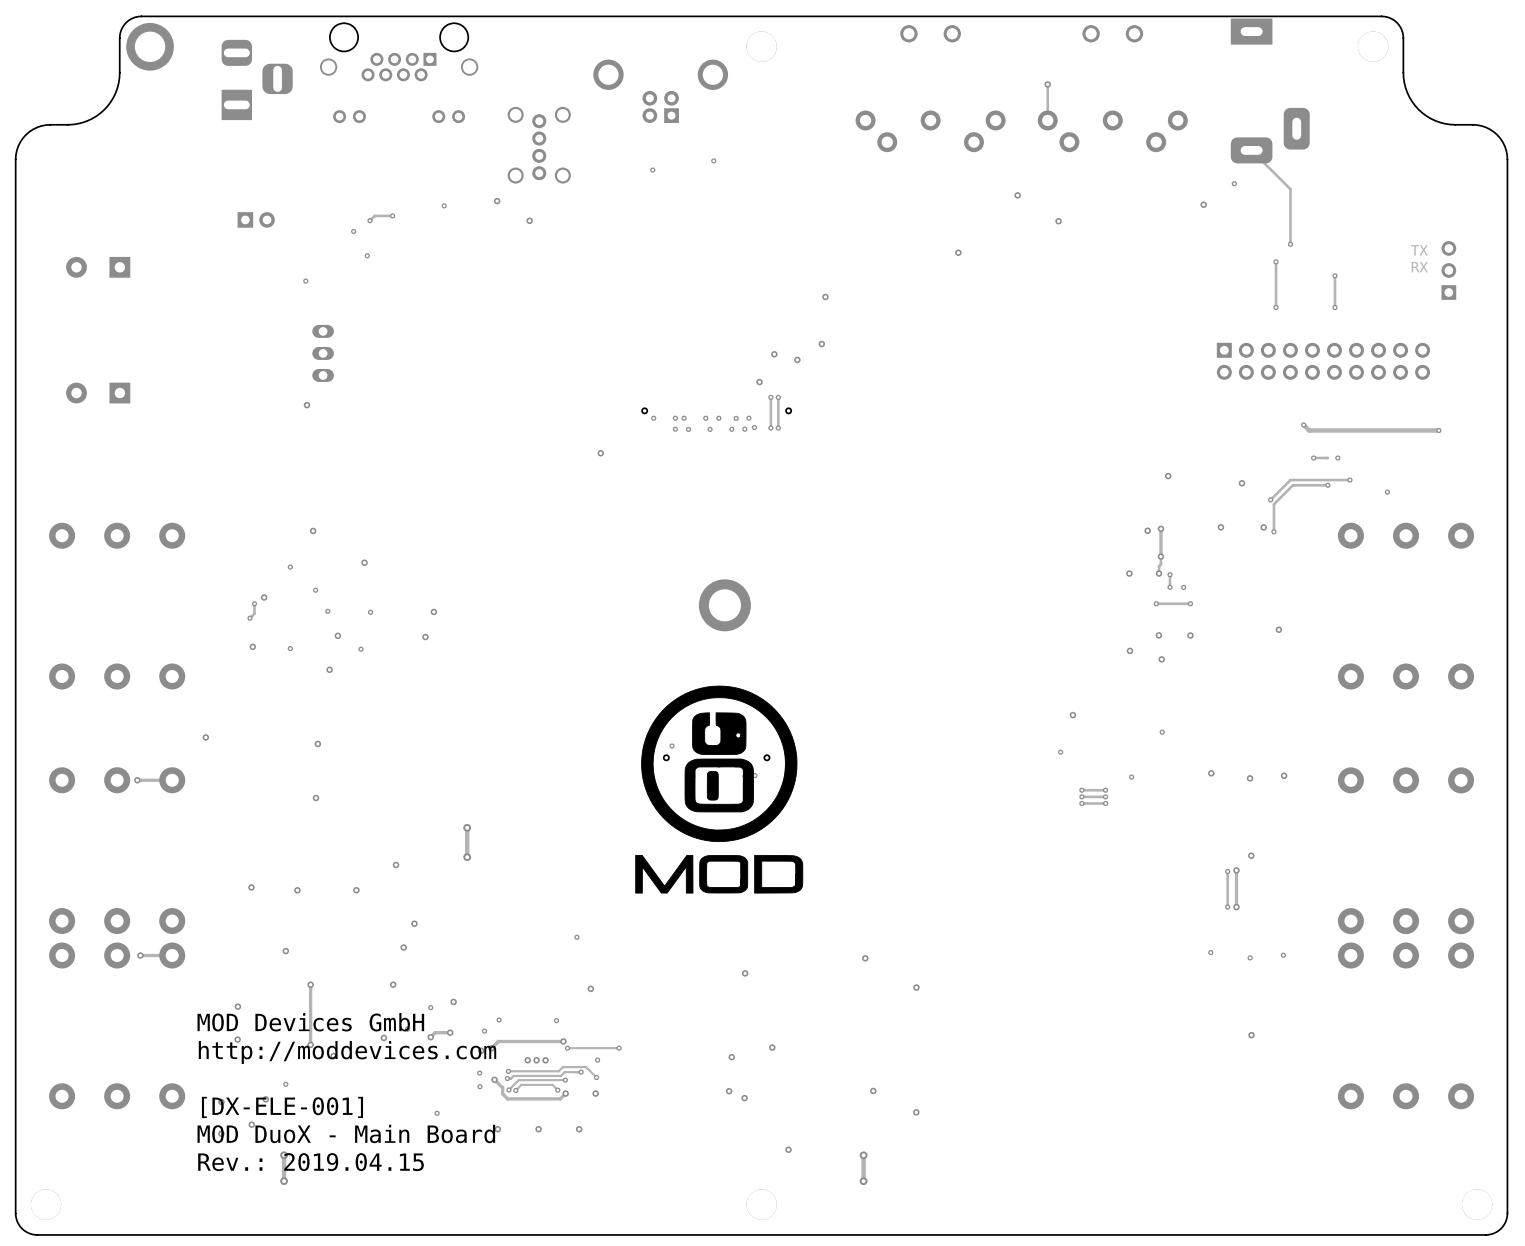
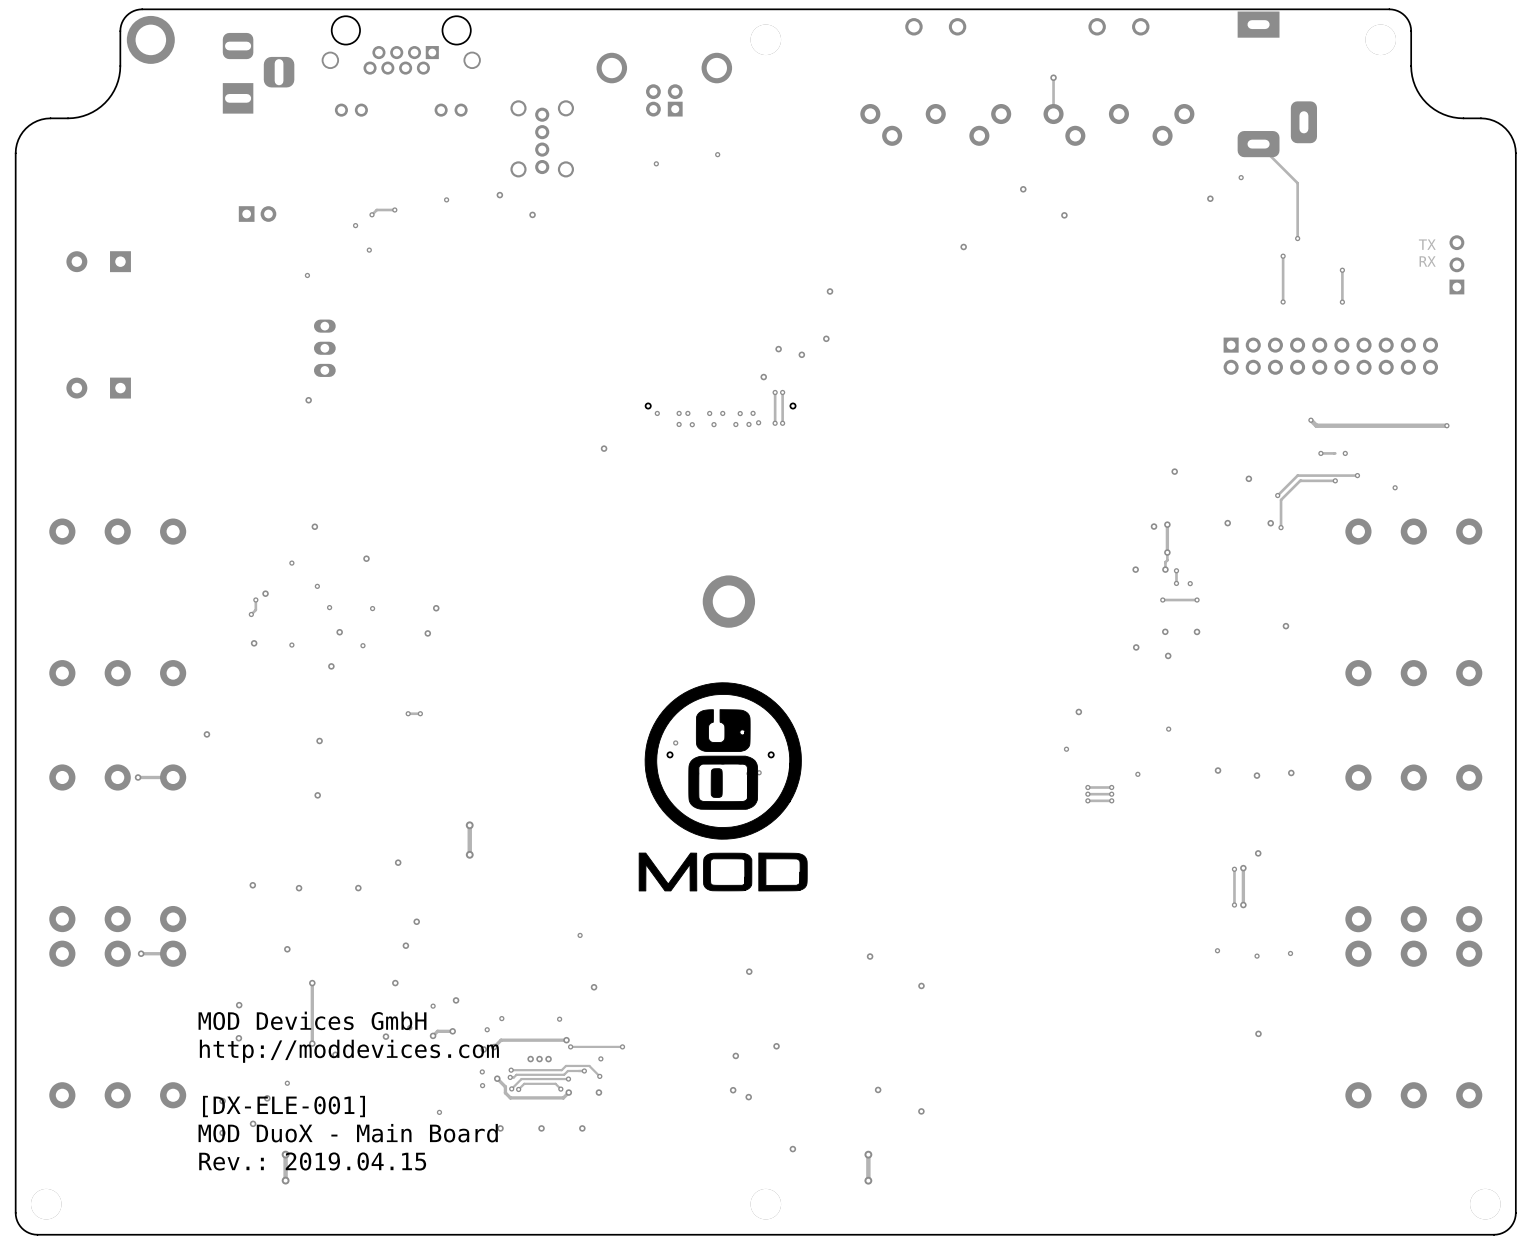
via: none -> (408, 713)
track: none -> (420, 713) (408, 713)
via: none -> (420, 713)

